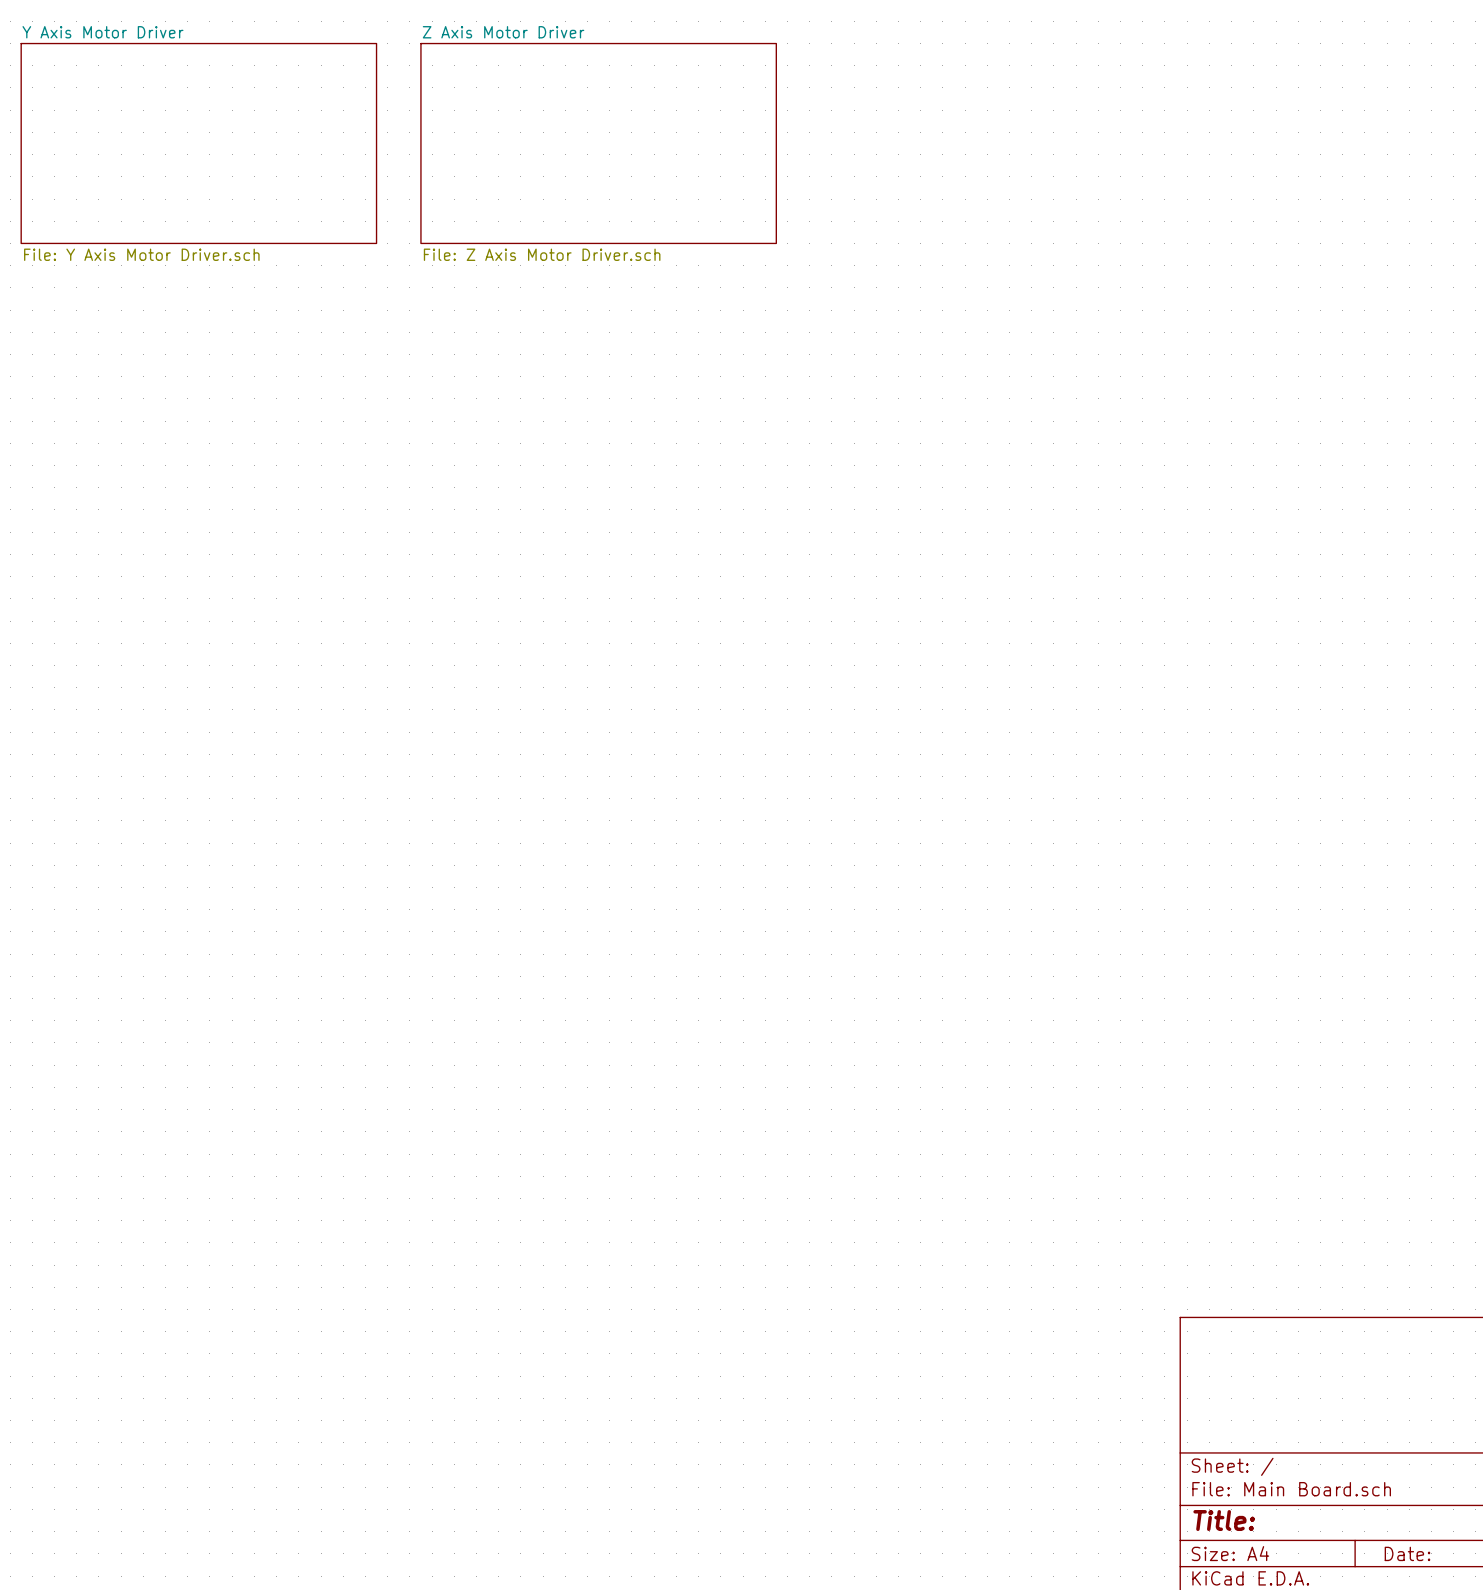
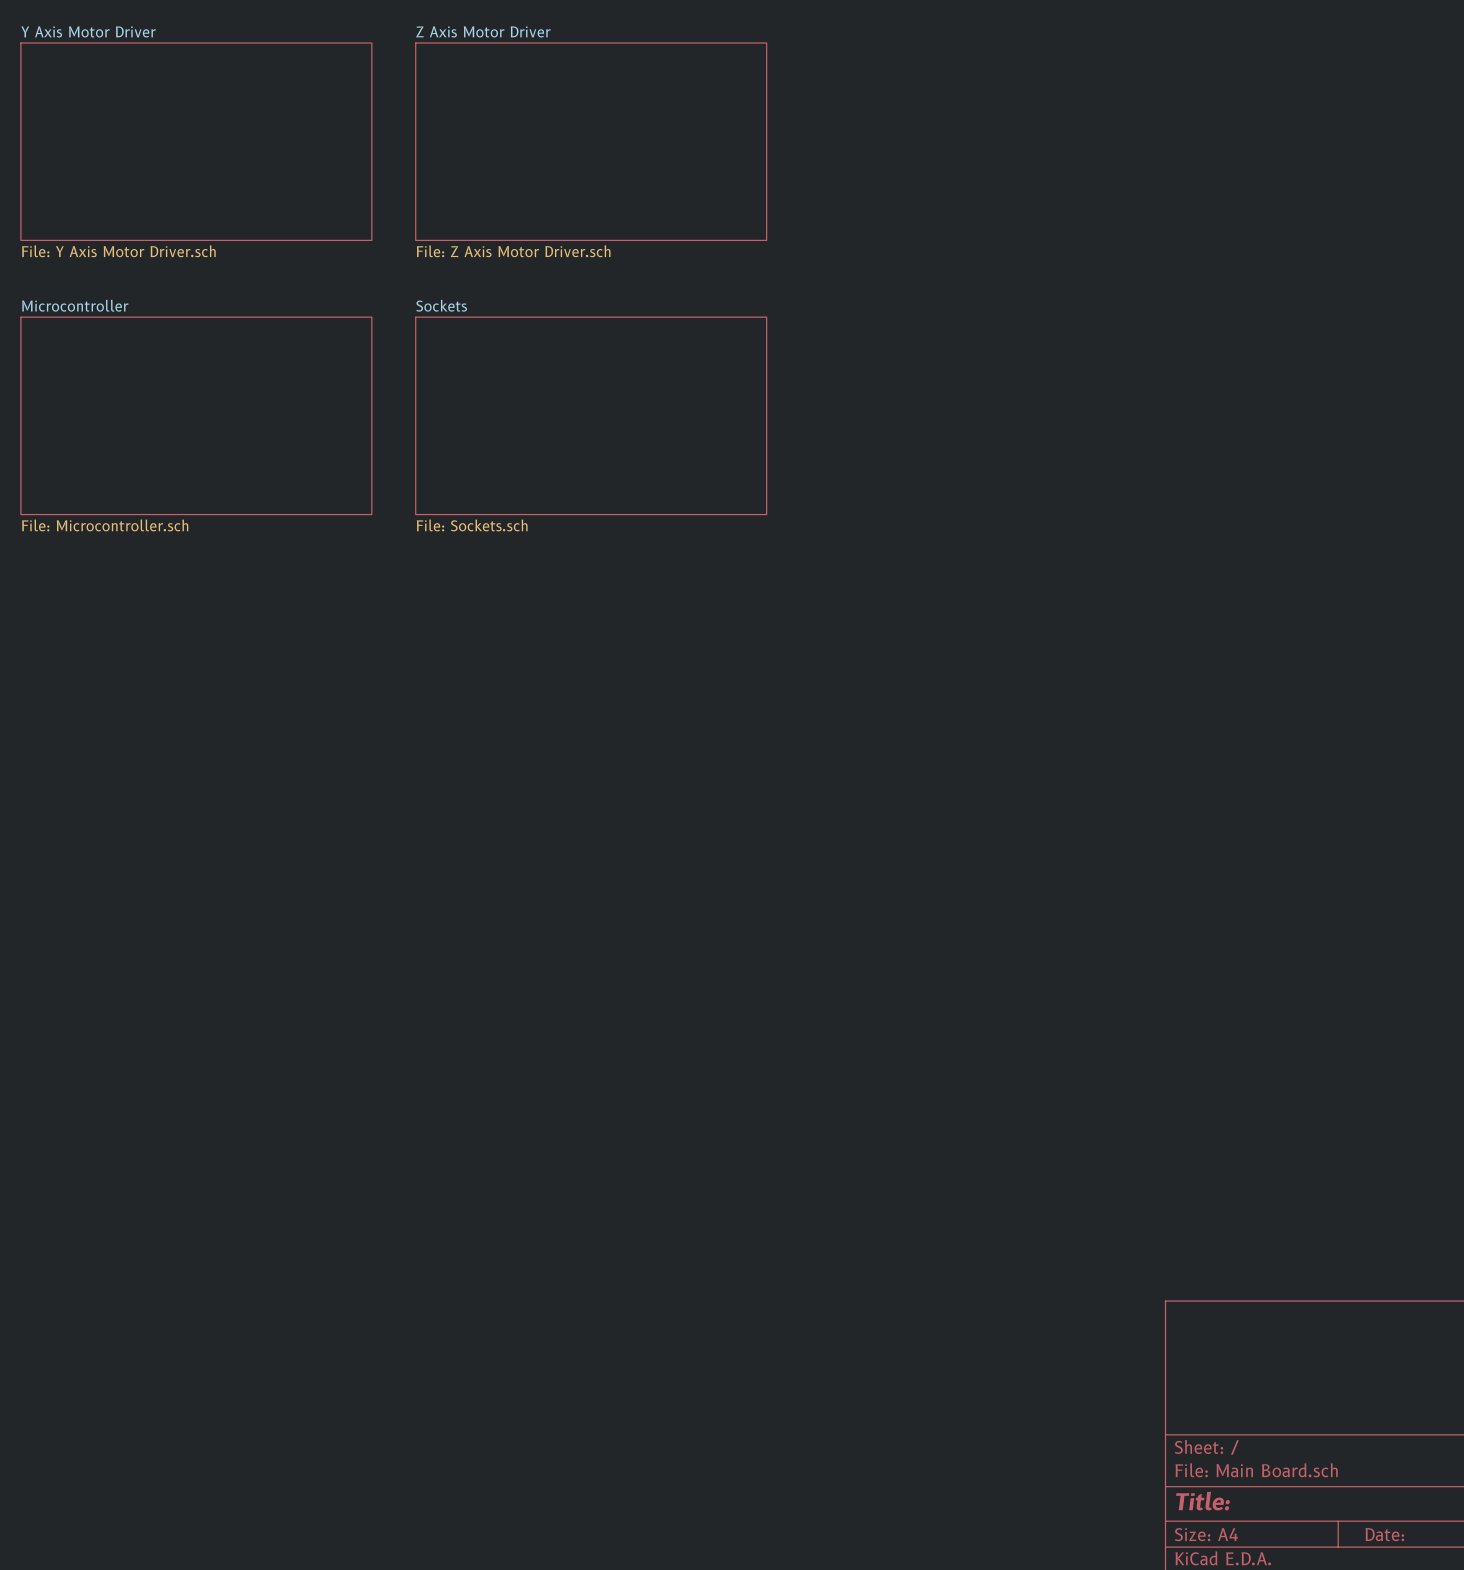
sheet Microcontroller: none -> File: Microcontroller.sch (196, 415)
sheet Sockets: none -> File: Sockets.sch (591, 415)

